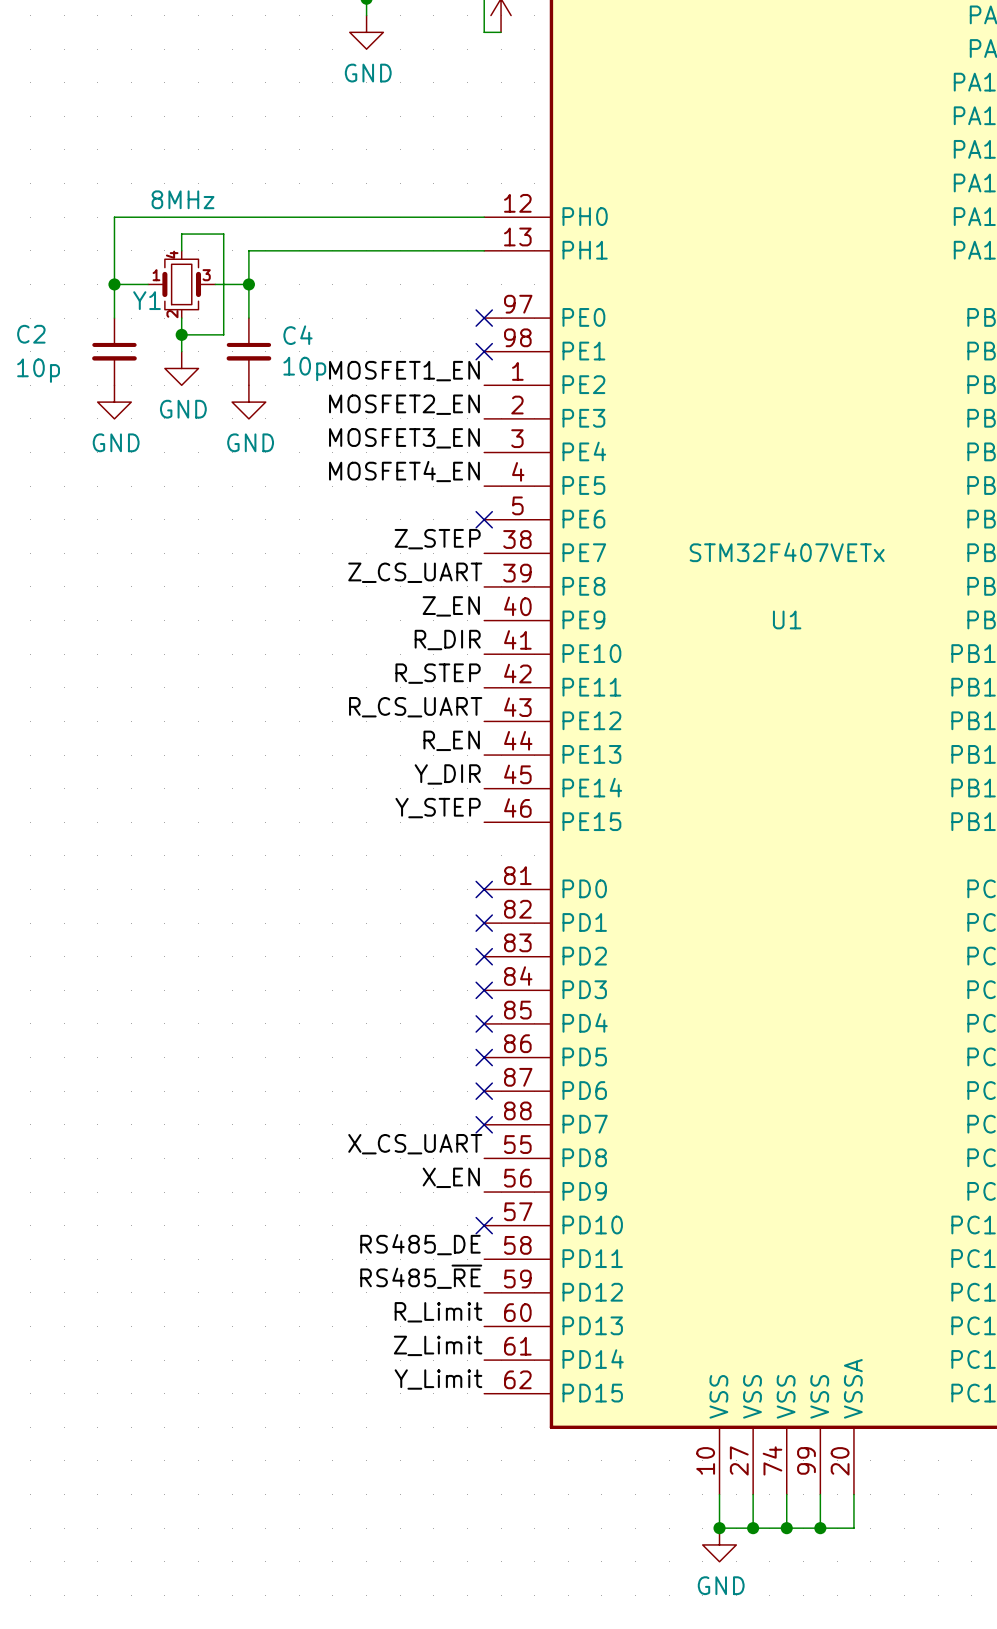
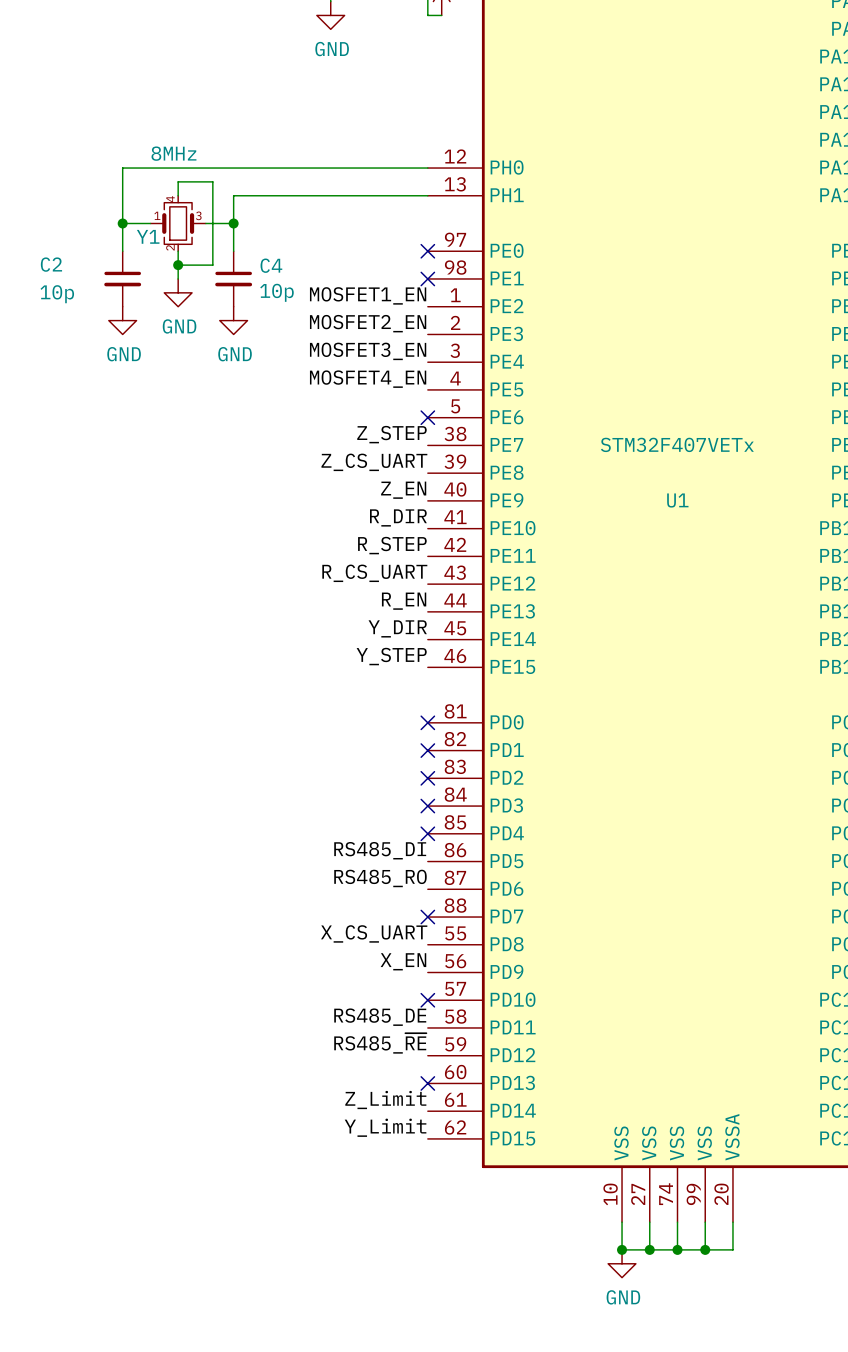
label: none -> RS485_DI (380, 850)
no-connect mark: (484, 1057) -> none
label: none -> RS485_RO (380, 878)
no-connect mark: (484, 1091) -> none
label: R_Limit (438, 1312) -> none
no-connect mark: none -> (427, 1083)

